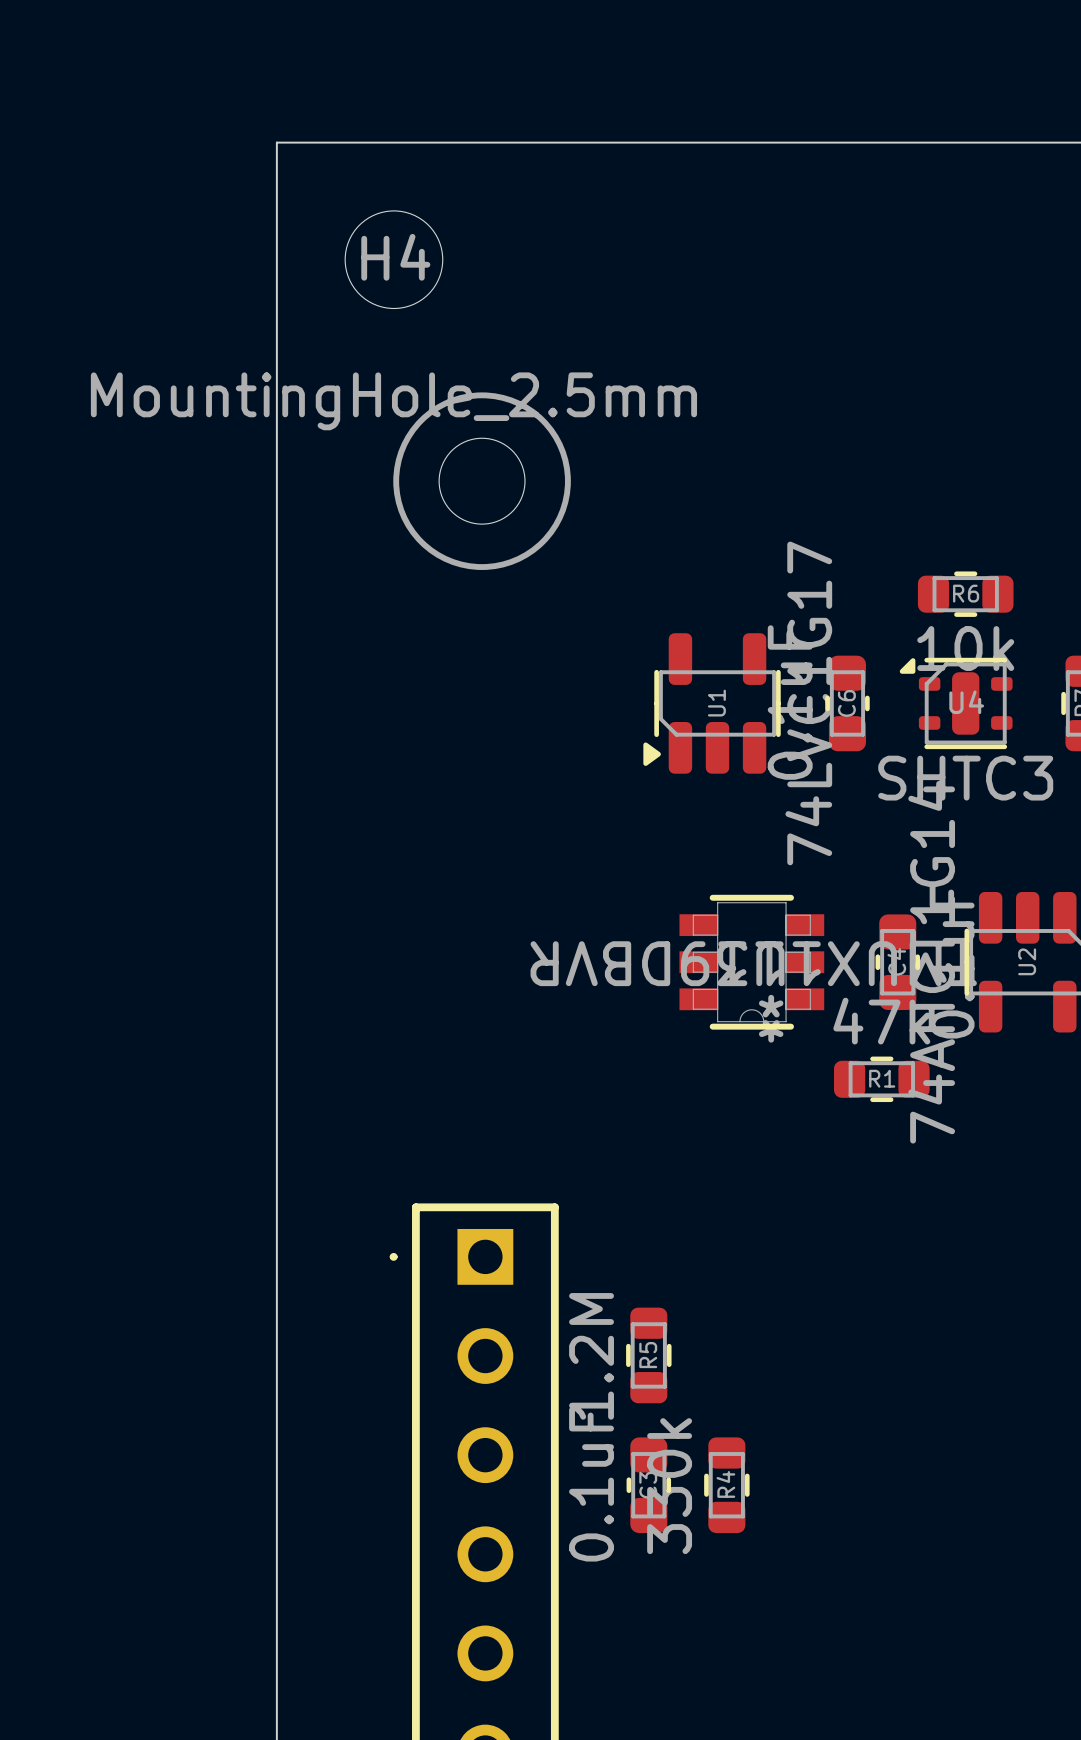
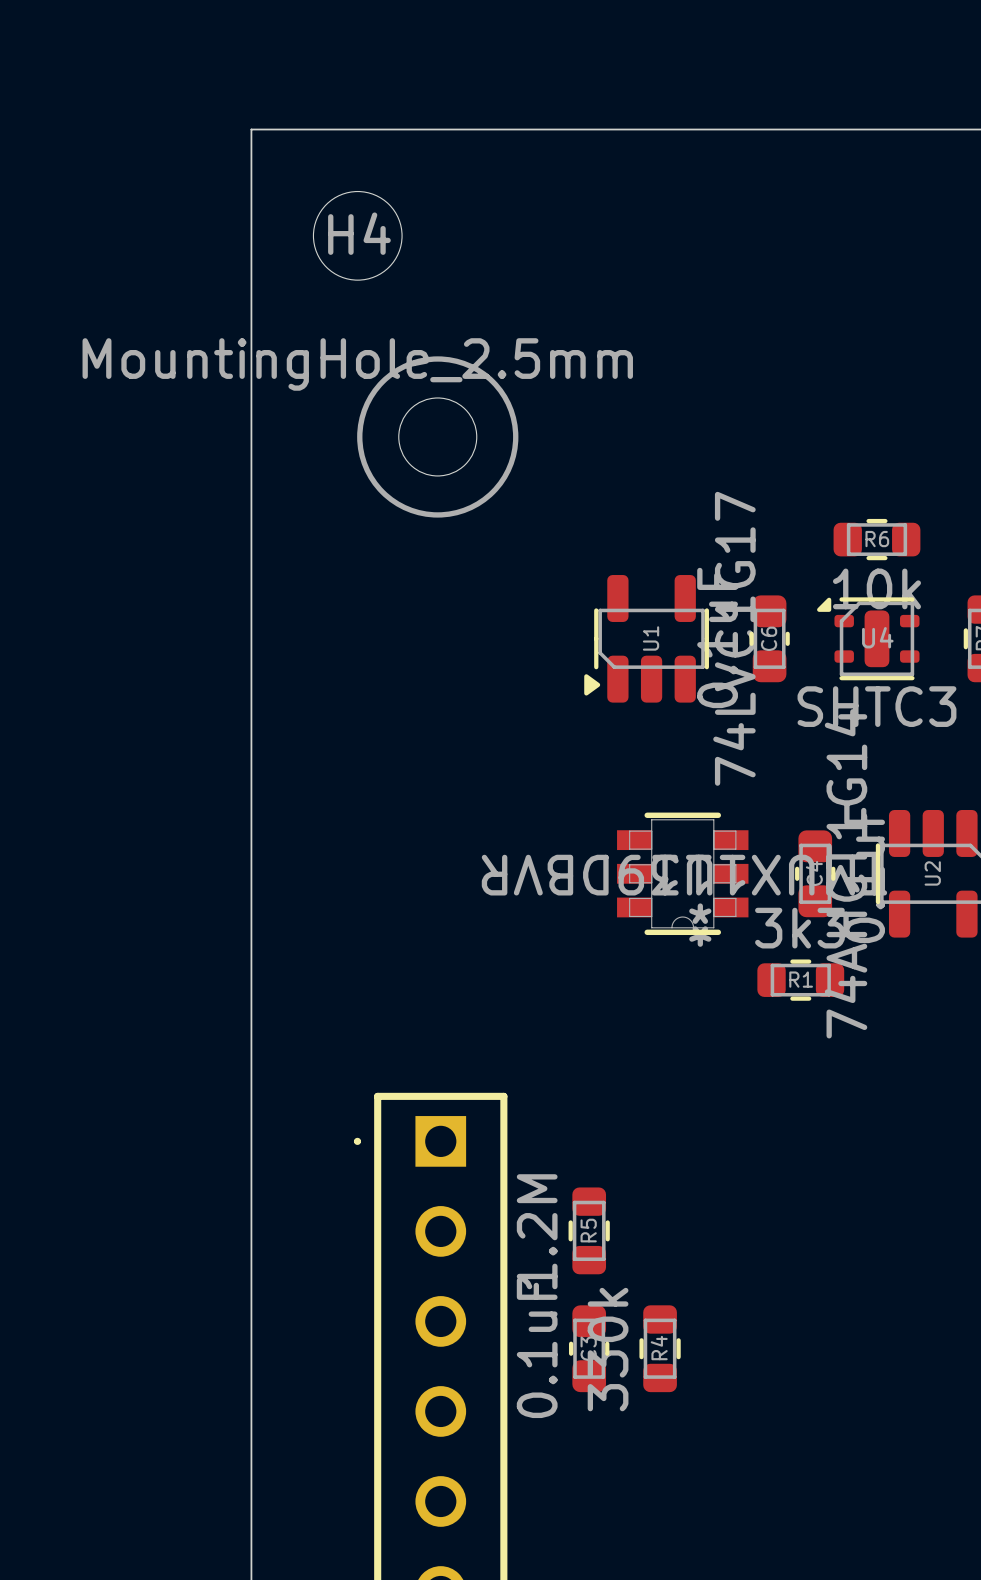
R1 value: 47k (881, 1021) -> 3k3 (799, 928)

